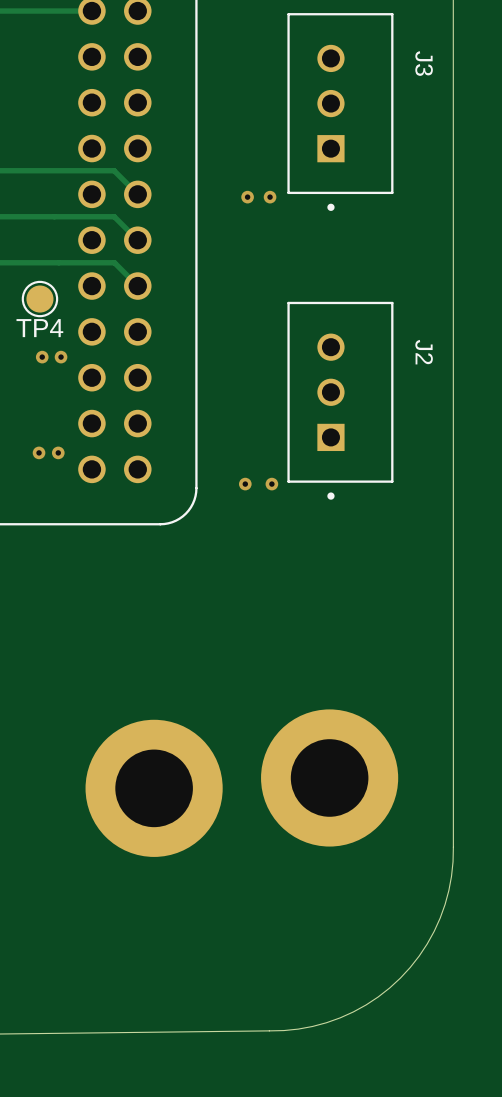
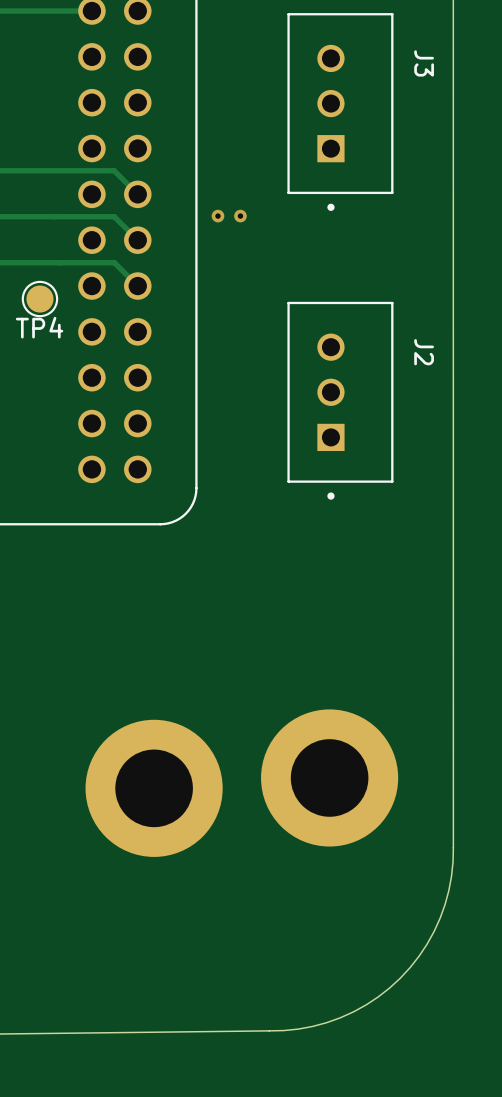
via: (247, 197) -> none
via: (270, 197) -> none
via: none -> (218, 216)
via: none -> (240, 216)
via: (42, 357) -> none
via: (61, 357) -> none
via: (39, 452) -> none
via: (58, 452) -> none
via: (245, 484) -> none
via: (271, 484) -> none

